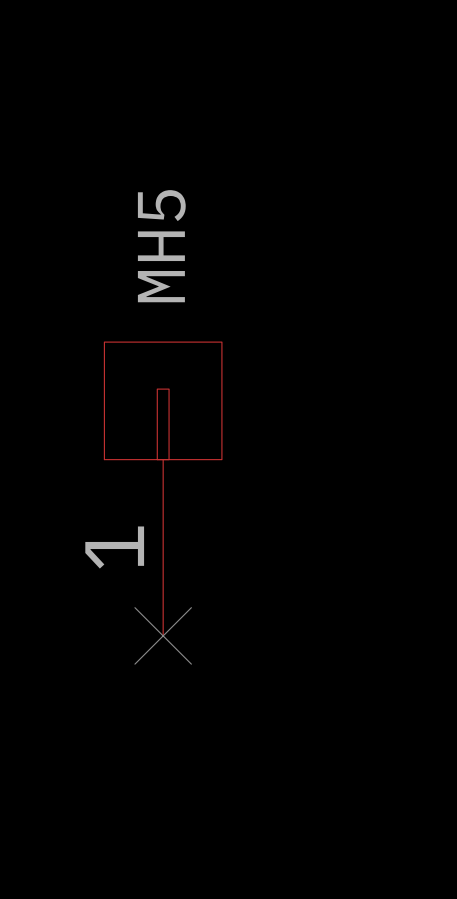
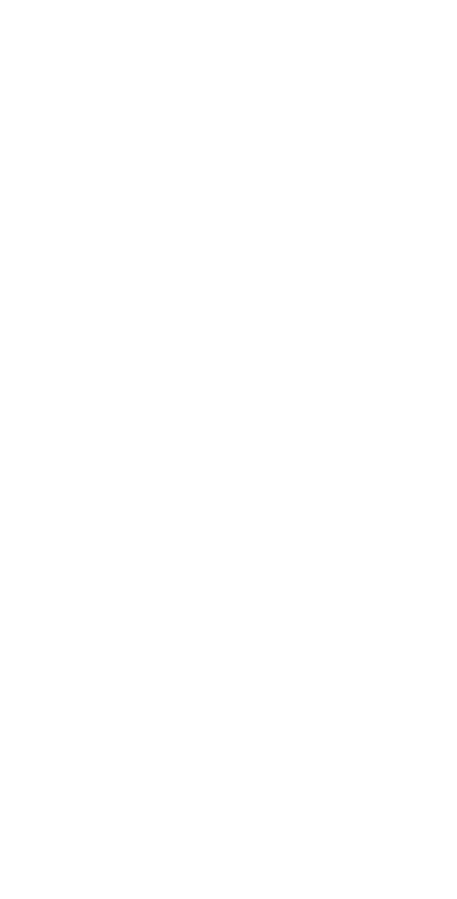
MH5: (163, 489) -> none
no-connect mark: (163, 635) -> none

